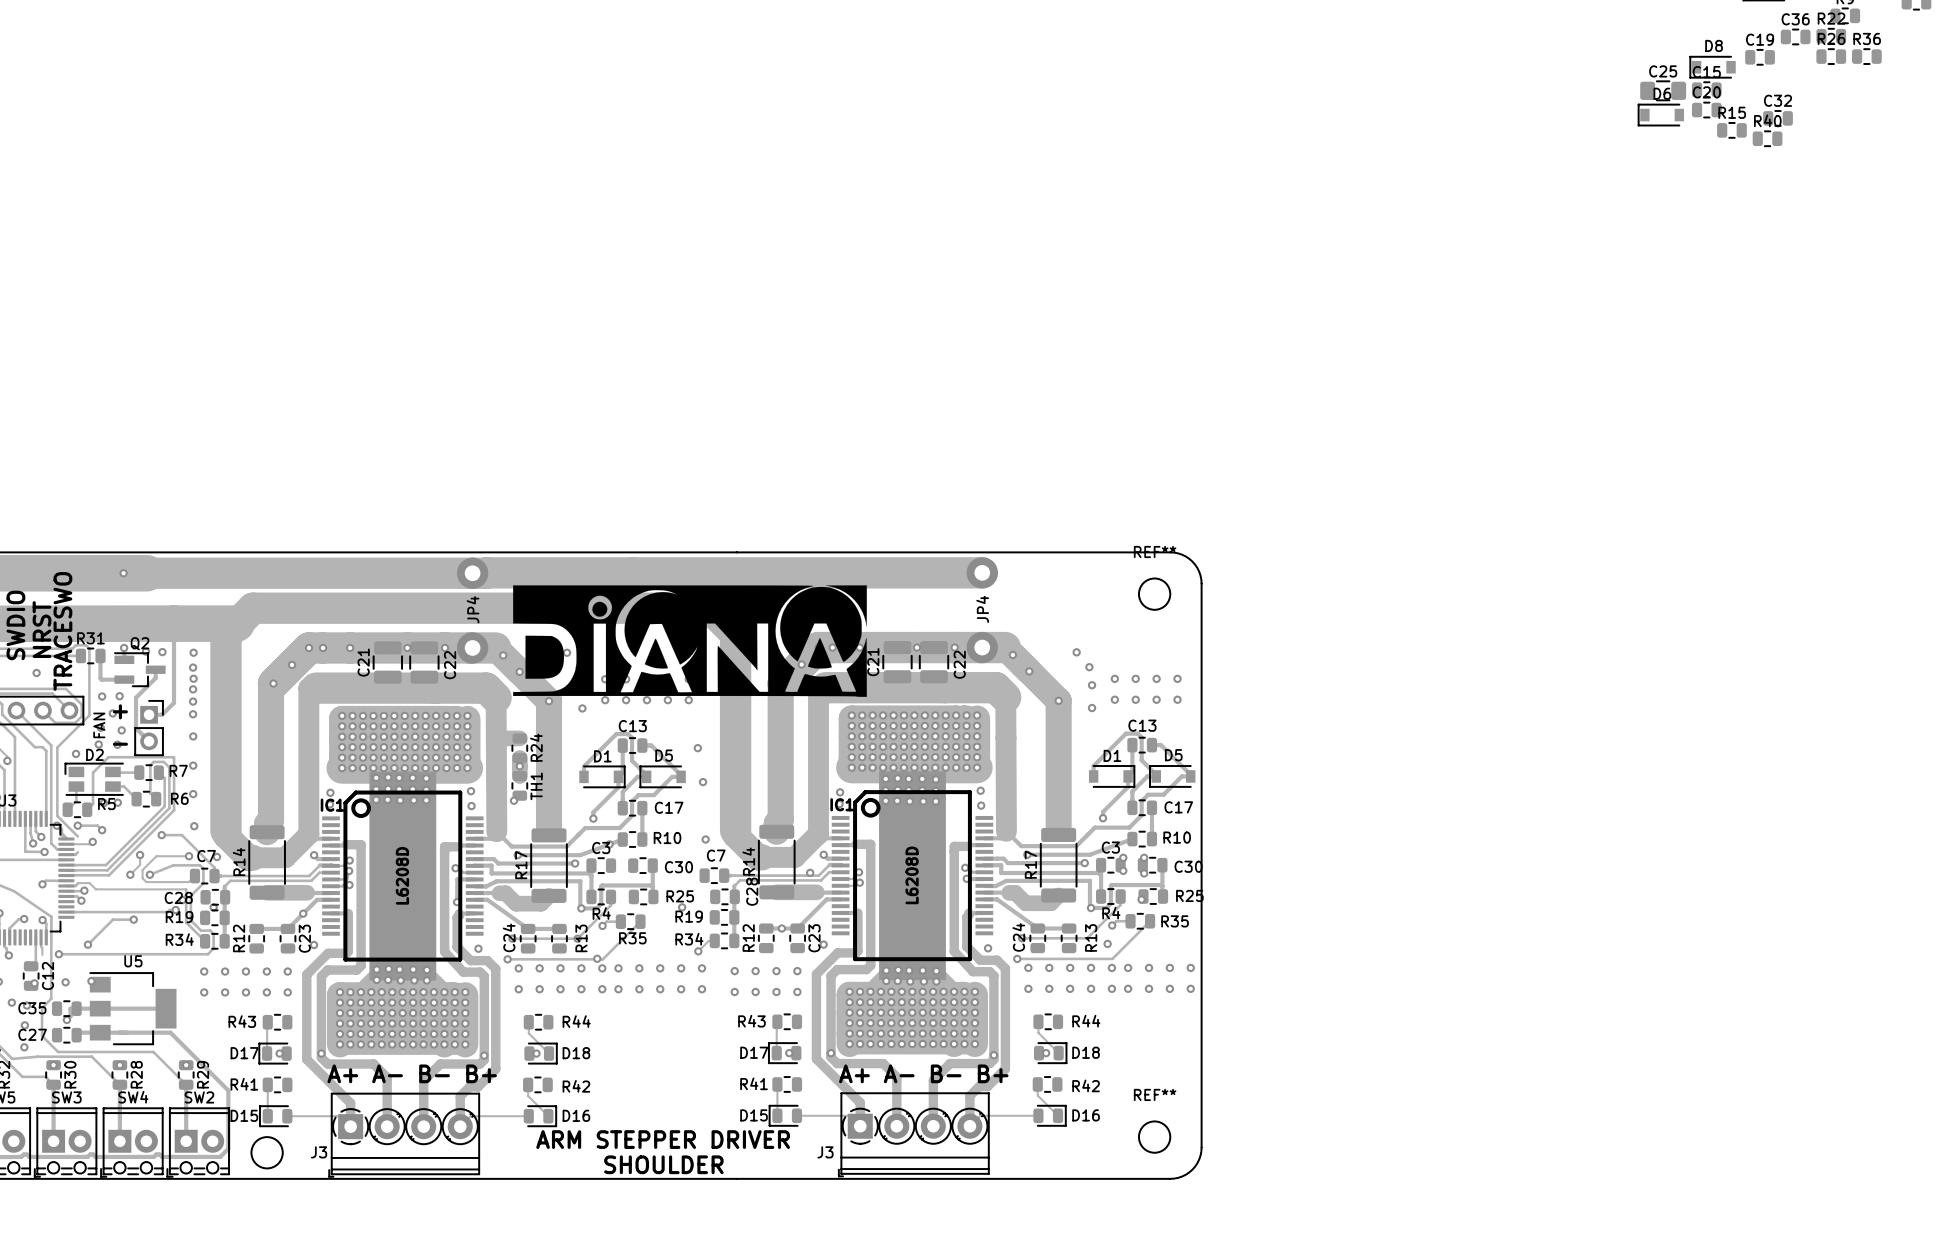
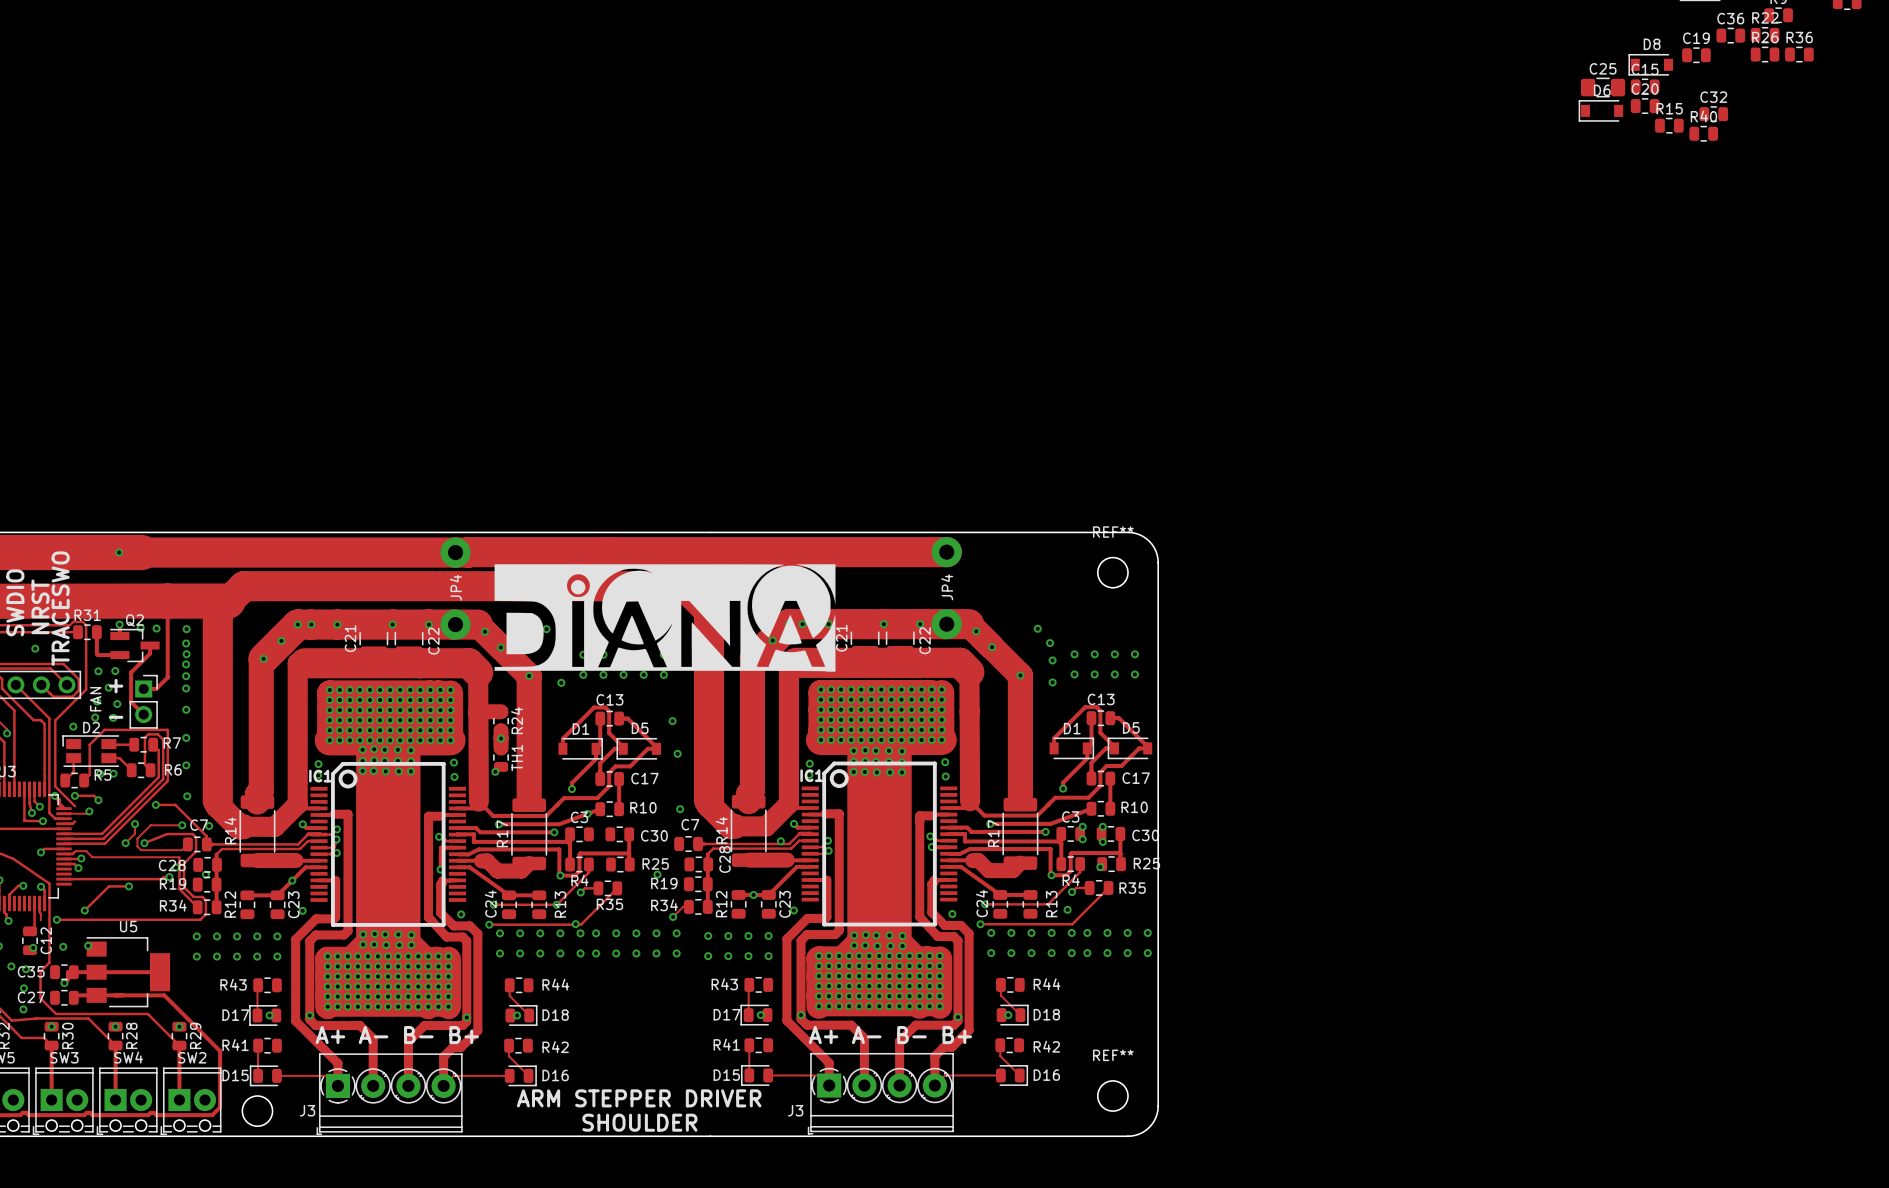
IC1 value: L6208D (402, 875) -> none
IC1 value: L6208D (912, 875) -> none

